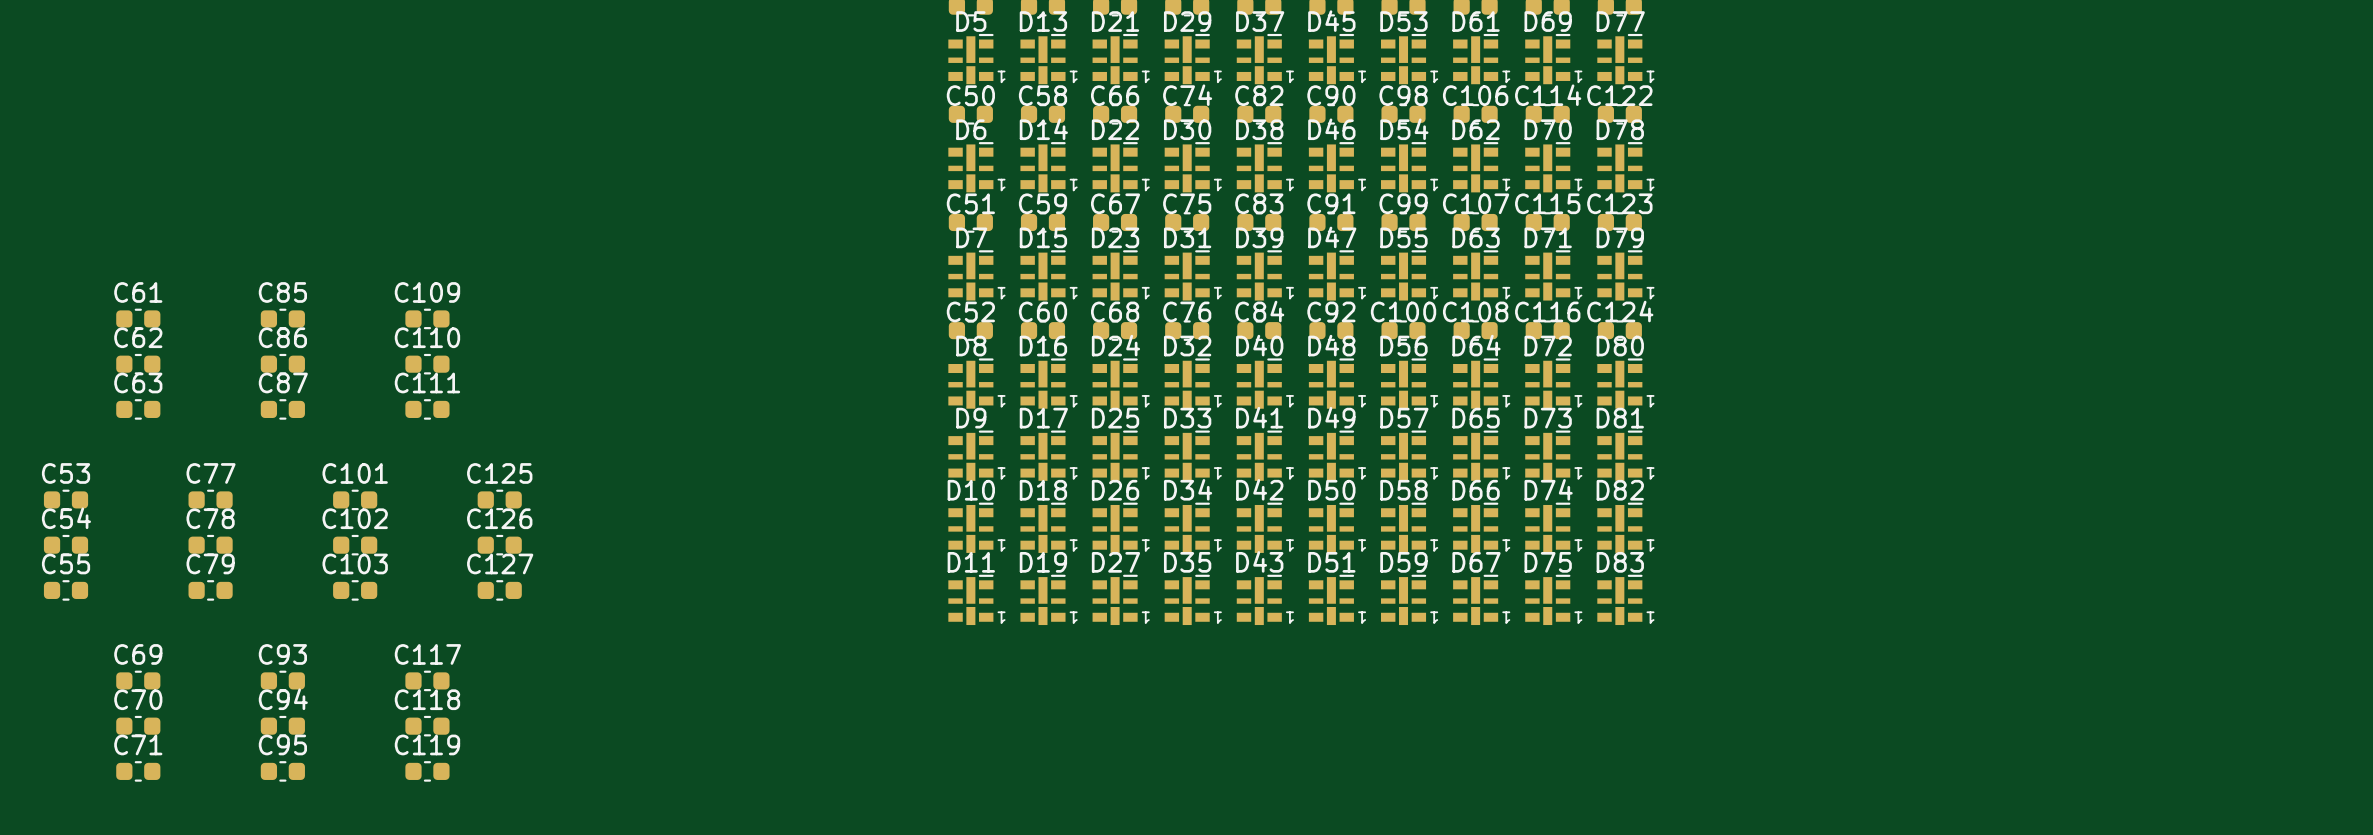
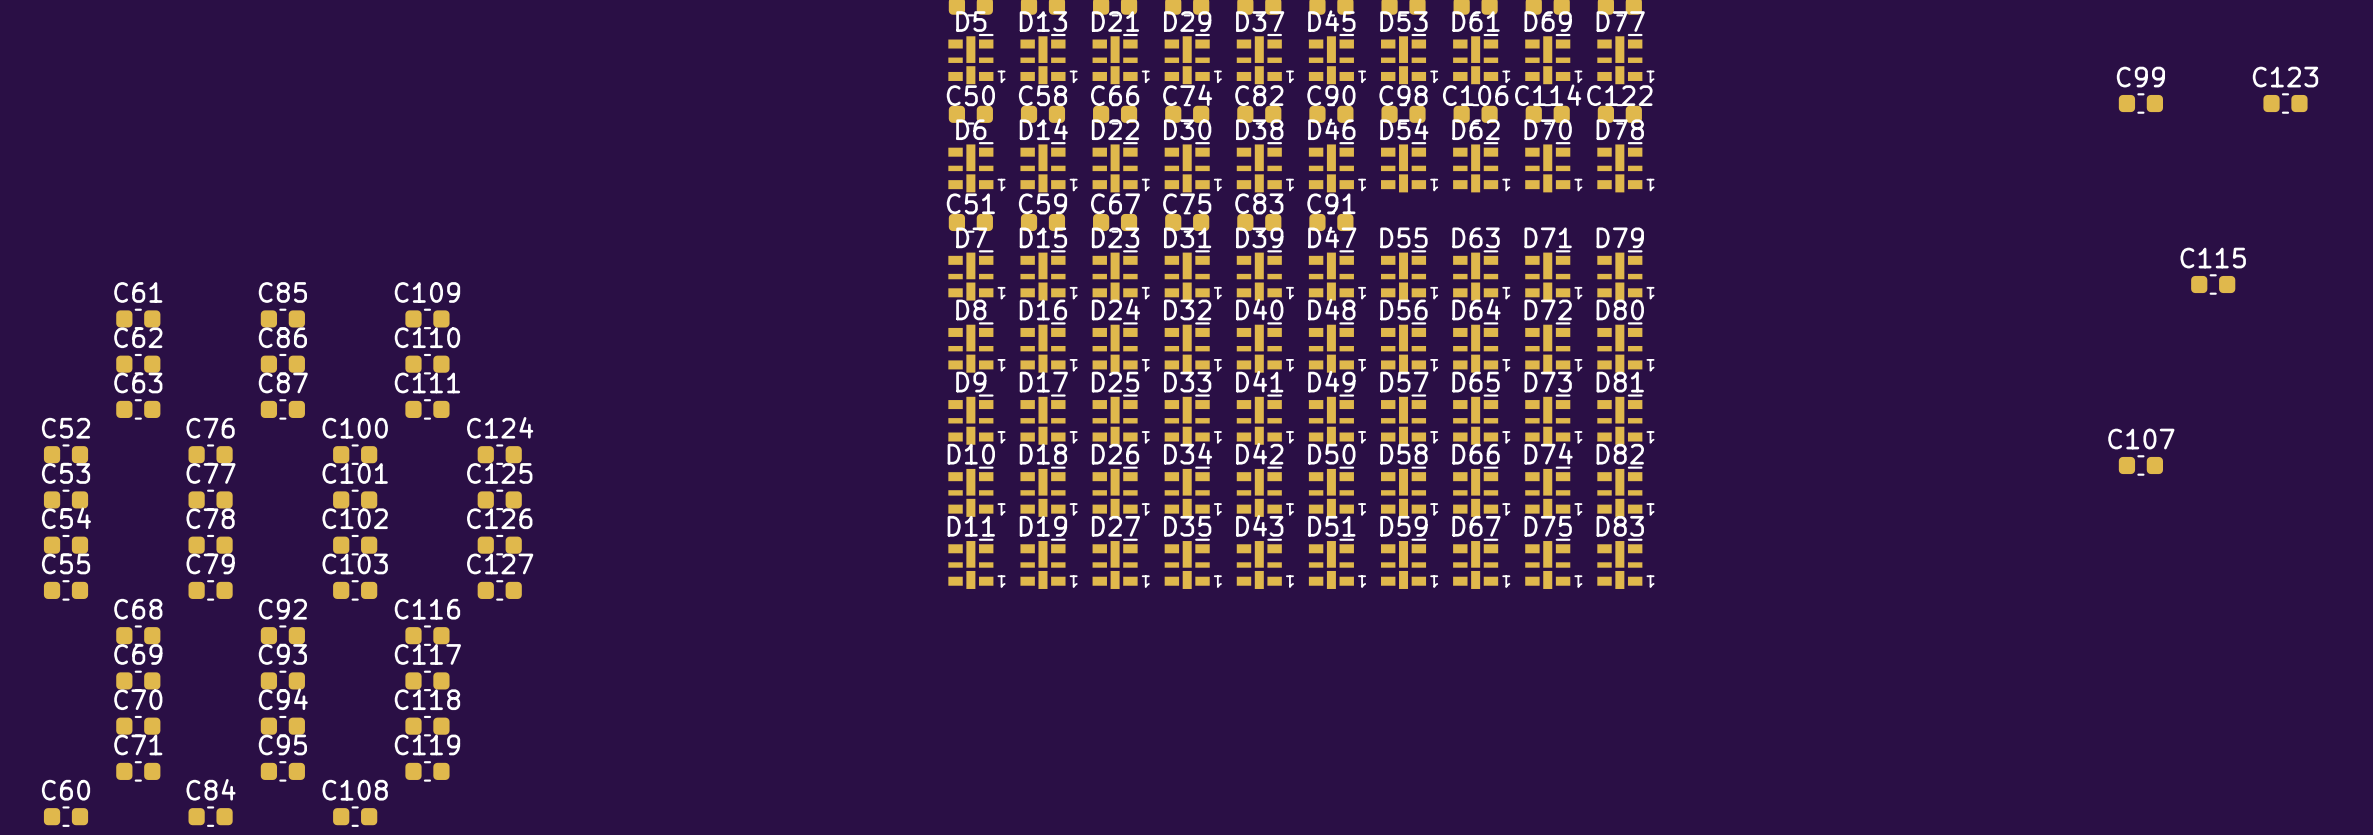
C99 name position: C99 (1403, 203) -> C99 (2140, 77)
C107 name position: C107 (1476, 203) -> C107 (2141, 439)
C115 name position: C115 (1547, 203) -> C115 (2213, 258)
C123 name position: C123 (1619, 203) -> C123 (2285, 77)
C99 position: (1403, 222) -> (2140, 103)
C107 position: (1475, 222) -> (2140, 465)
C115 position: (1547, 222) -> (2213, 284)
C123 position: (1619, 222) -> (2285, 103)
C52 name position: C52 (970, 311) -> C52 (66, 428)
C60 name position: C60 (1042, 311) -> C60 (66, 790)
C68 name position: C68 (1115, 311) -> C68 (138, 609)
C76 name position: C76 (1187, 311) -> C76 (210, 428)
C84 name position: C84 (1259, 311) -> C84 (211, 789)
C92 name position: C92 (1331, 311) -> C92 (282, 609)
C100 name position: C100 (1403, 311) -> C100 (355, 428)
C108 name position: C108 (1475, 311) -> C108 (355, 790)
C116 name position: C116 (1547, 311) -> C116 (427, 609)
C124 name position: C124 (1620, 311) -> C124 (500, 427)
C52 position: (970, 330) -> (66, 454)
C60 position: (1042, 330) -> (66, 816)
C68 position: (1115, 330) -> (138, 635)
C76 position: (1187, 330) -> (210, 454)
C84 position: (1259, 330) -> (210, 816)
C92 position: (1331, 330) -> (282, 635)
C100 position: (1403, 330) -> (355, 454)
C108 position: (1475, 330) -> (355, 816)
C116 position: (1547, 330) -> (427, 635)
C124 position: (1619, 330) -> (499, 454)
D8 position: (970, 383) -> (970, 347)
D16 position: (1043, 383) -> (1043, 347)
D24 position: (1115, 383) -> (1115, 347)
D32 position: (1187, 383) -> (1187, 347)
D40 position: (1259, 383) -> (1259, 347)
D48 position: (1331, 383) -> (1331, 347)
D56 position: (1403, 383) -> (1403, 347)
D64 position: (1475, 383) -> (1475, 347)
D72 position: (1547, 383) -> (1547, 347)
D80 position: (1619, 383) -> (1619, 347)
D9 position: (970, 455) -> (970, 419)
D17 position: (1043, 455) -> (1043, 419)
D25 position: (1115, 455) -> (1115, 419)
D33 position: (1187, 455) -> (1187, 419)
D41 position: (1259, 455) -> (1259, 419)
D49 position: (1331, 455) -> (1331, 419)
D57 position: (1403, 455) -> (1403, 419)
D65 position: (1475, 455) -> (1475, 419)
D73 position: (1547, 455) -> (1547, 419)
D81 position: (1619, 455) -> (1619, 419)
D10 position: (970, 527) -> (970, 491)
D18 position: (1043, 527) -> (1043, 491)
D26 position: (1115, 527) -> (1115, 491)
D34 position: (1187, 527) -> (1187, 491)
D42 position: (1259, 527) -> (1259, 491)
D50 position: (1331, 527) -> (1331, 491)
D58 position: (1403, 527) -> (1403, 491)
D66 position: (1475, 527) -> (1475, 491)
D74 position: (1547, 527) -> (1547, 491)
D82 position: (1619, 527) -> (1619, 491)
D11 position: (970, 599) -> (970, 563)
D19 position: (1043, 599) -> (1043, 563)
D27 position: (1115, 599) -> (1115, 563)
D35 position: (1187, 599) -> (1187, 563)
D43 position: (1259, 599) -> (1259, 563)
D51 position: (1331, 599) -> (1331, 563)
D59 position: (1403, 599) -> (1403, 563)
D67 position: (1475, 599) -> (1475, 563)
D75 position: (1547, 599) -> (1547, 563)
D83 position: (1619, 599) -> (1619, 563)

